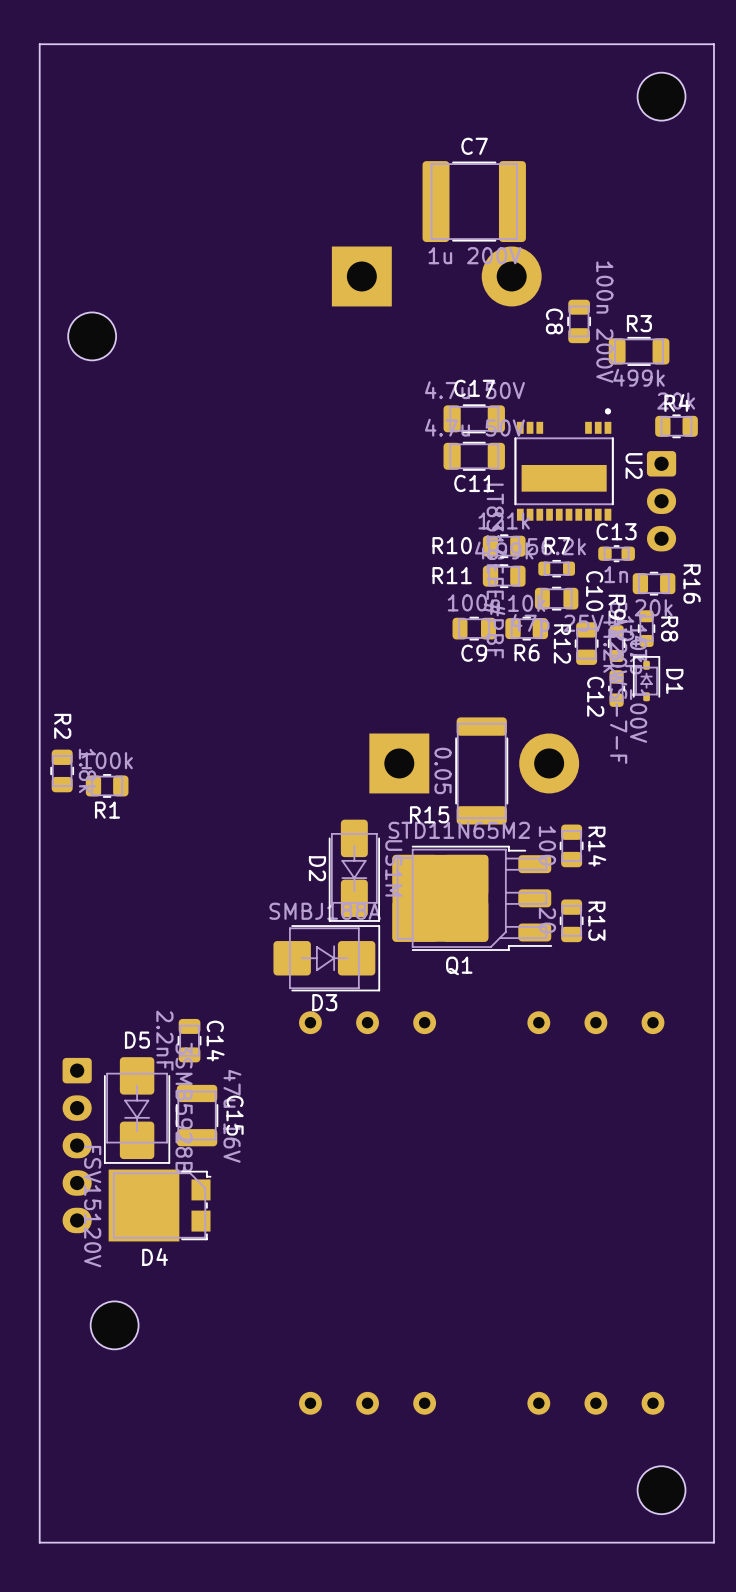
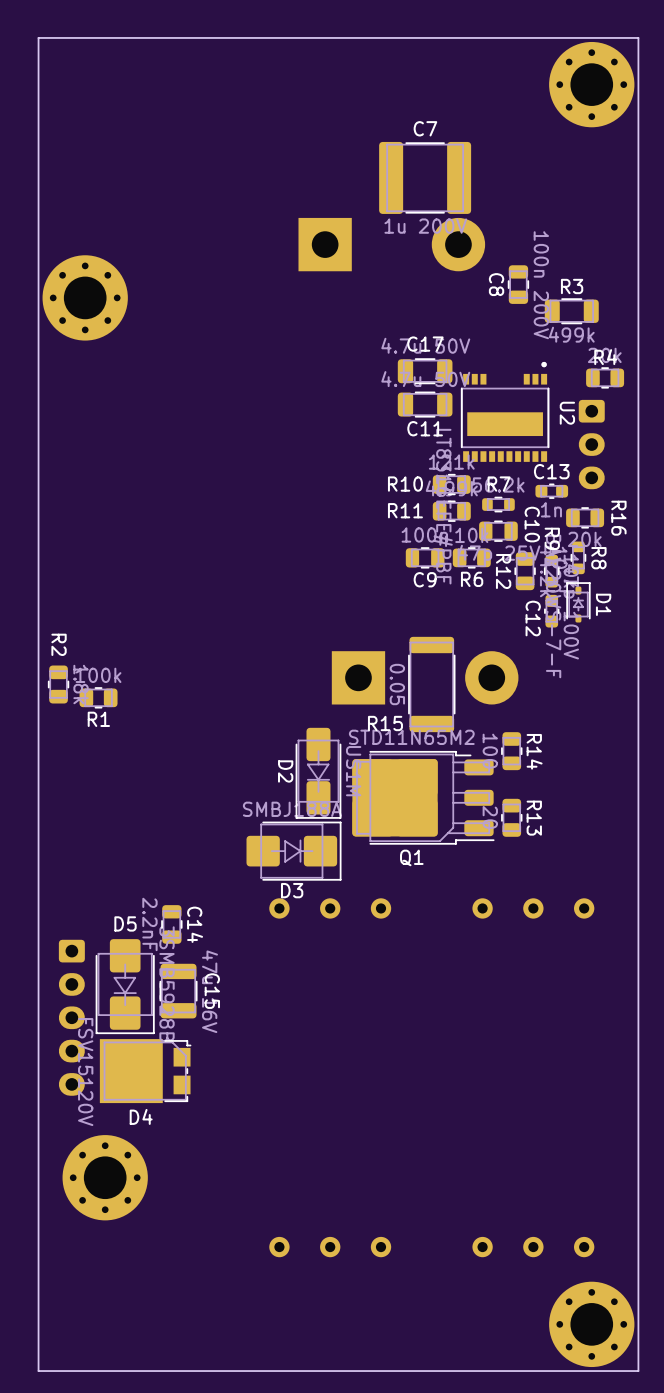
part footprint: [637, 72, 686, 121] -> [549, 41, 635, 128]
part footprint: [68, 312, 117, 361] -> [42, 255, 128, 341]
part footprint: [90, 1301, 139, 1350] -> [62, 1135, 148, 1221]
part footprint: [637, 1466, 686, 1515] -> [549, 1281, 635, 1368]

